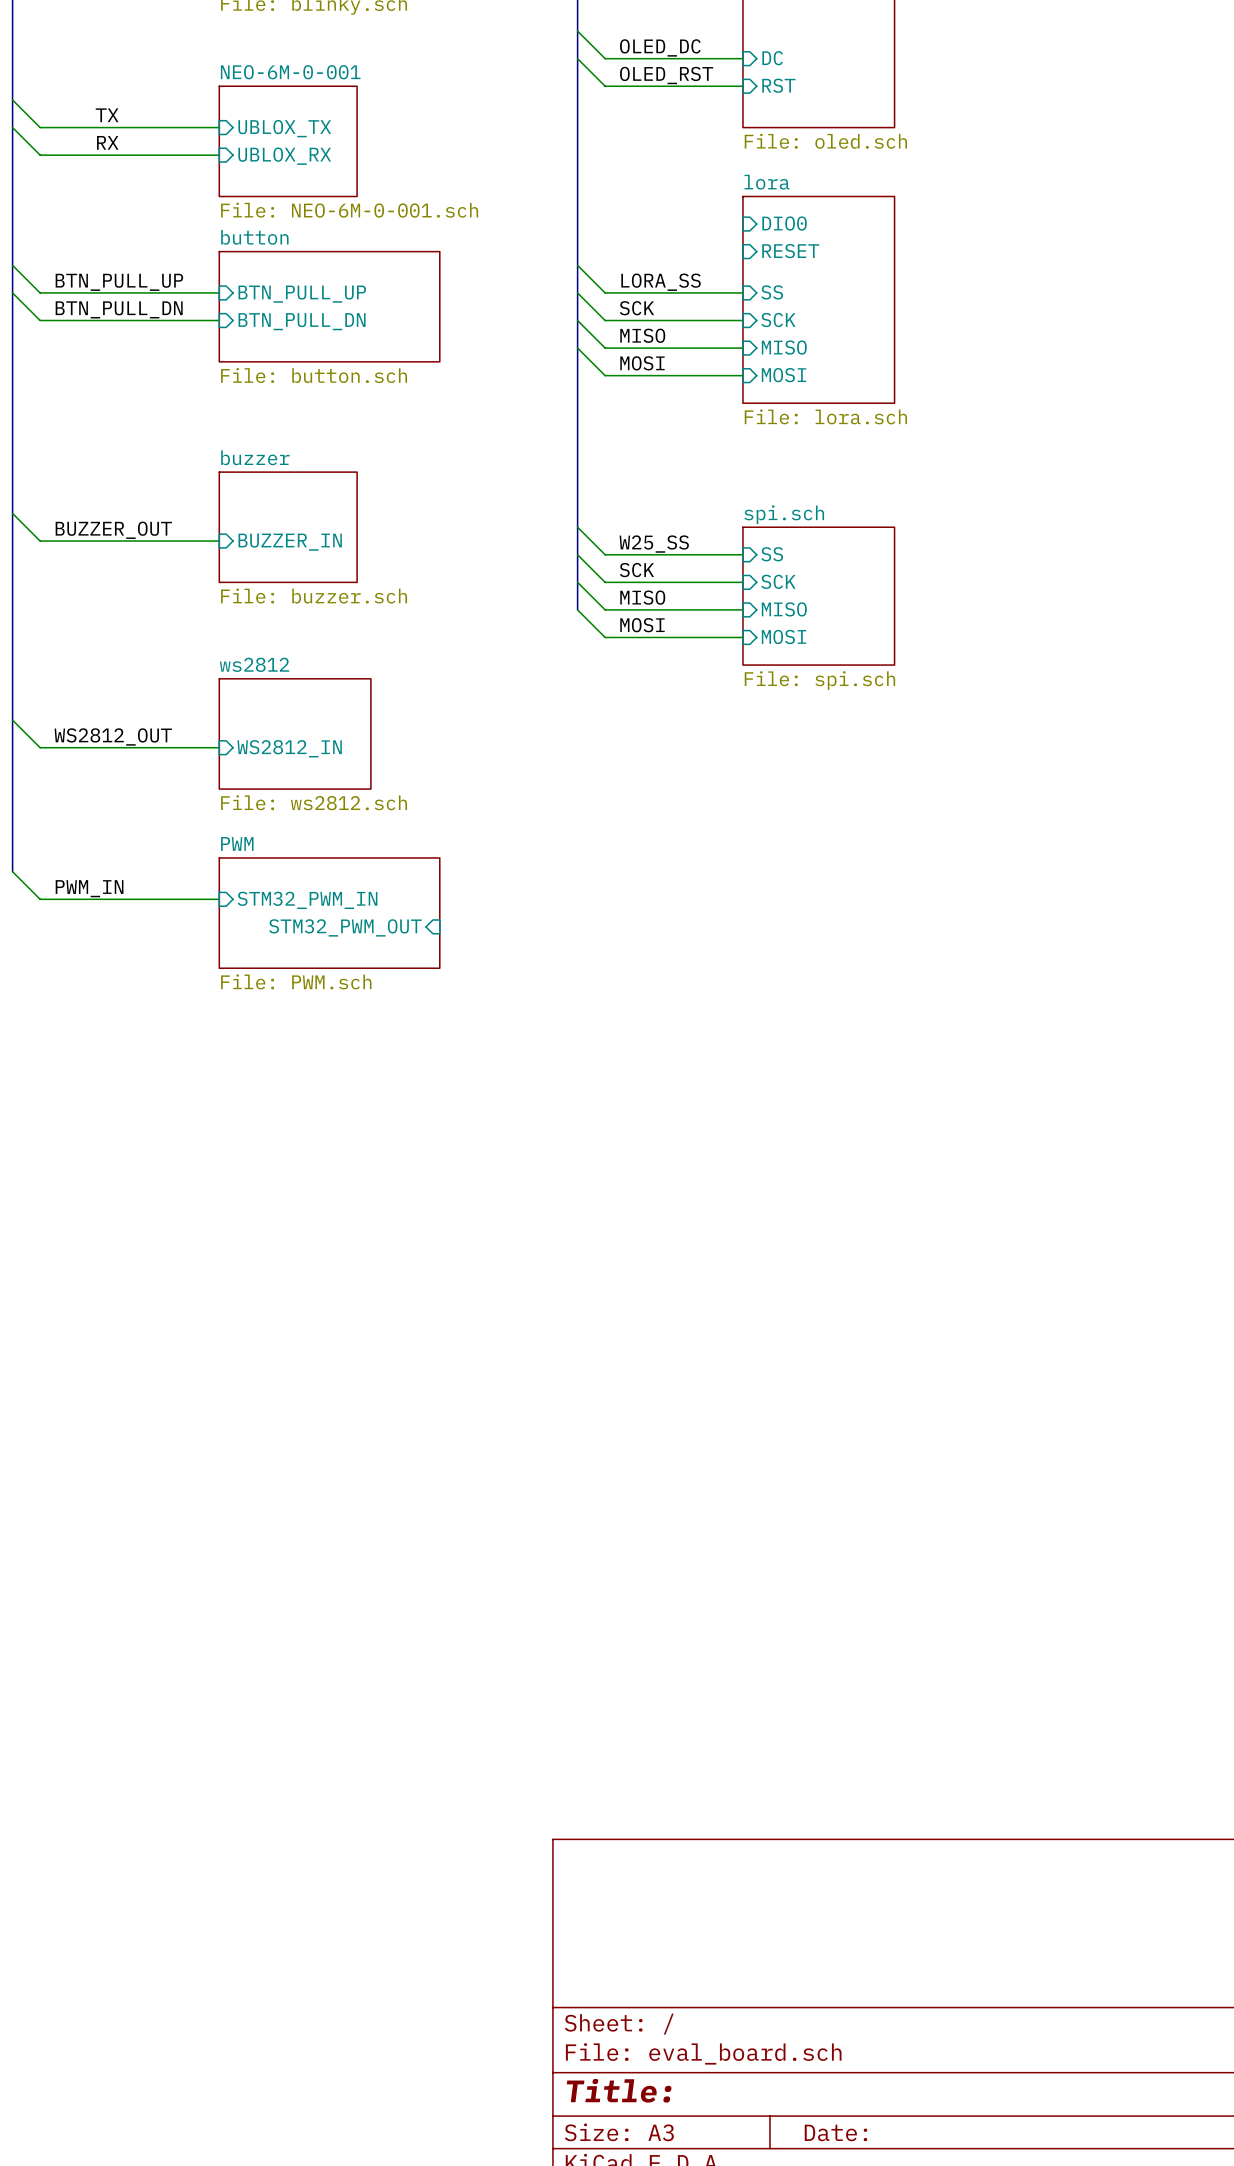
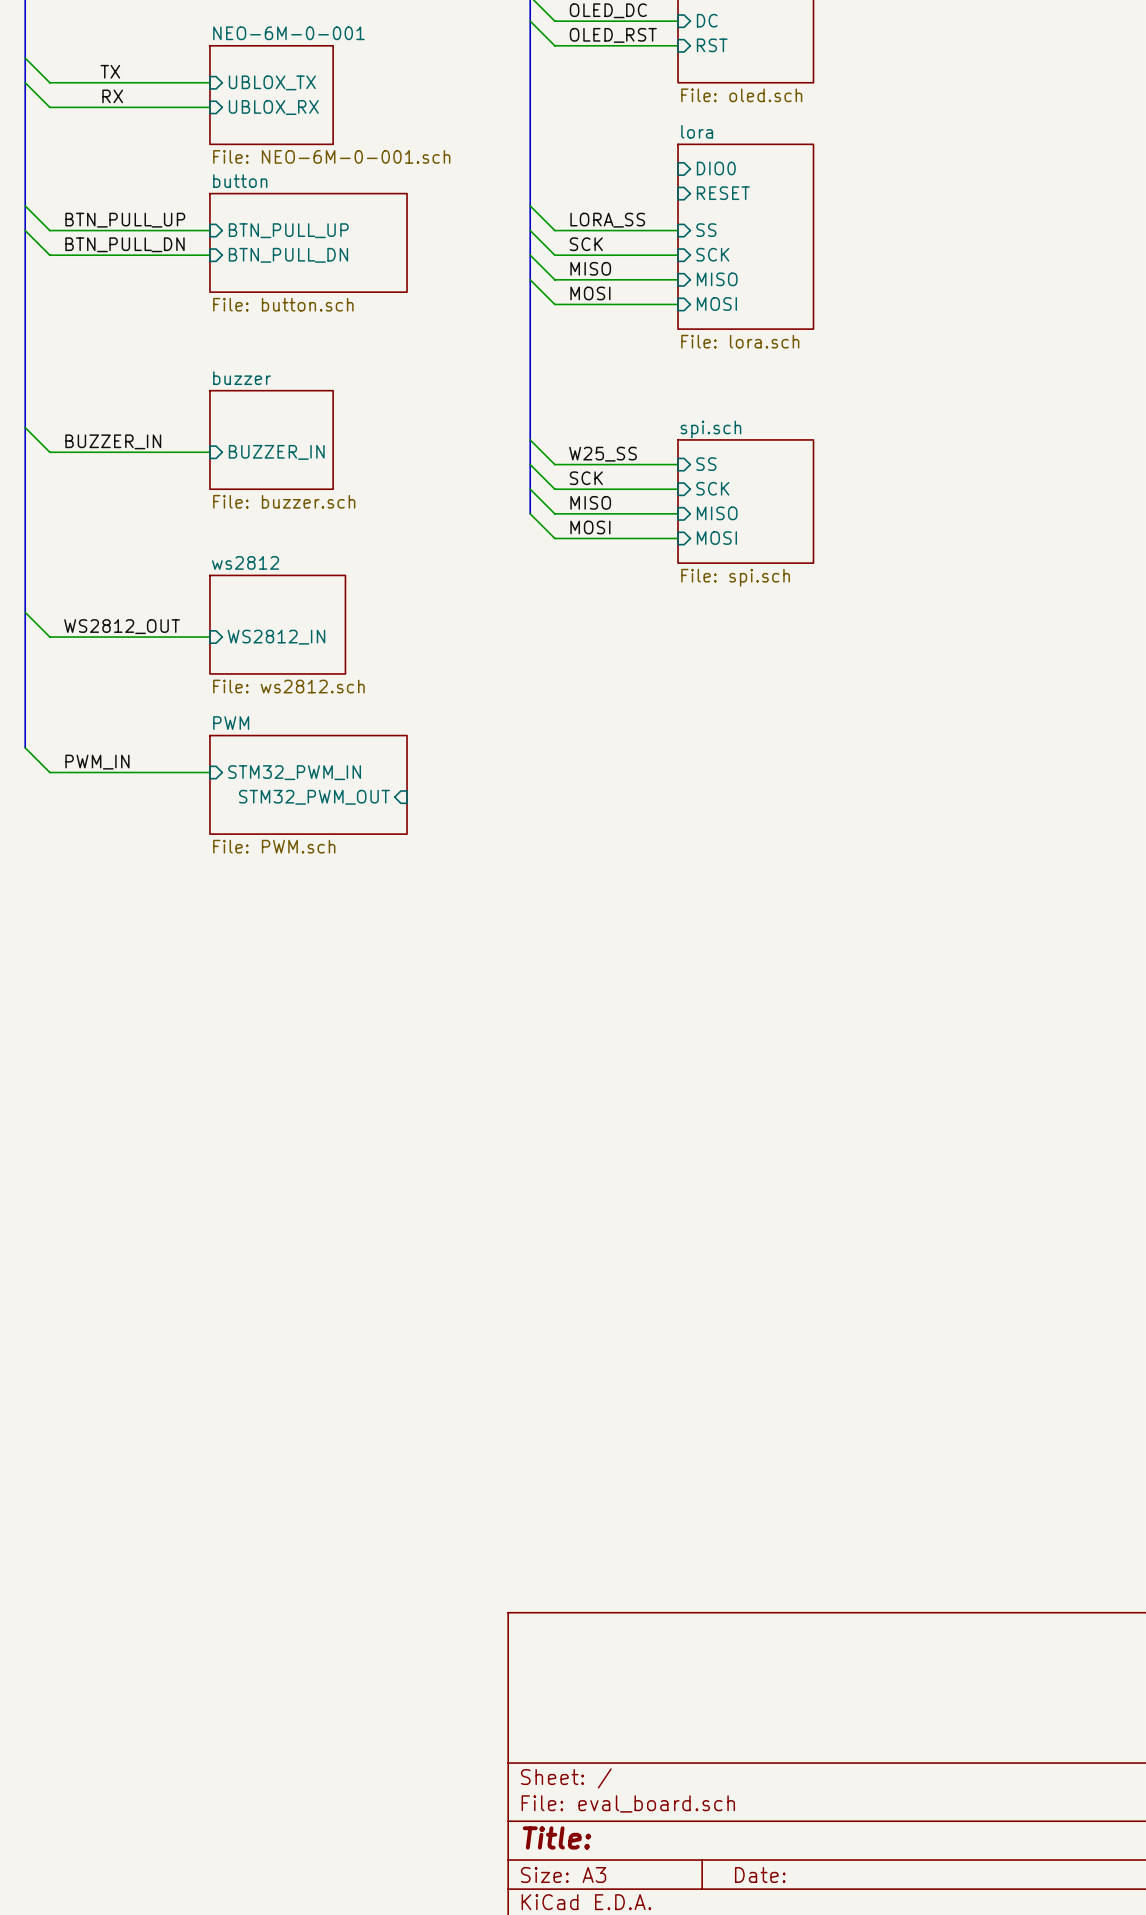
label: BUZZER_OUT (113, 530) -> BUZZER_IN (113, 441)

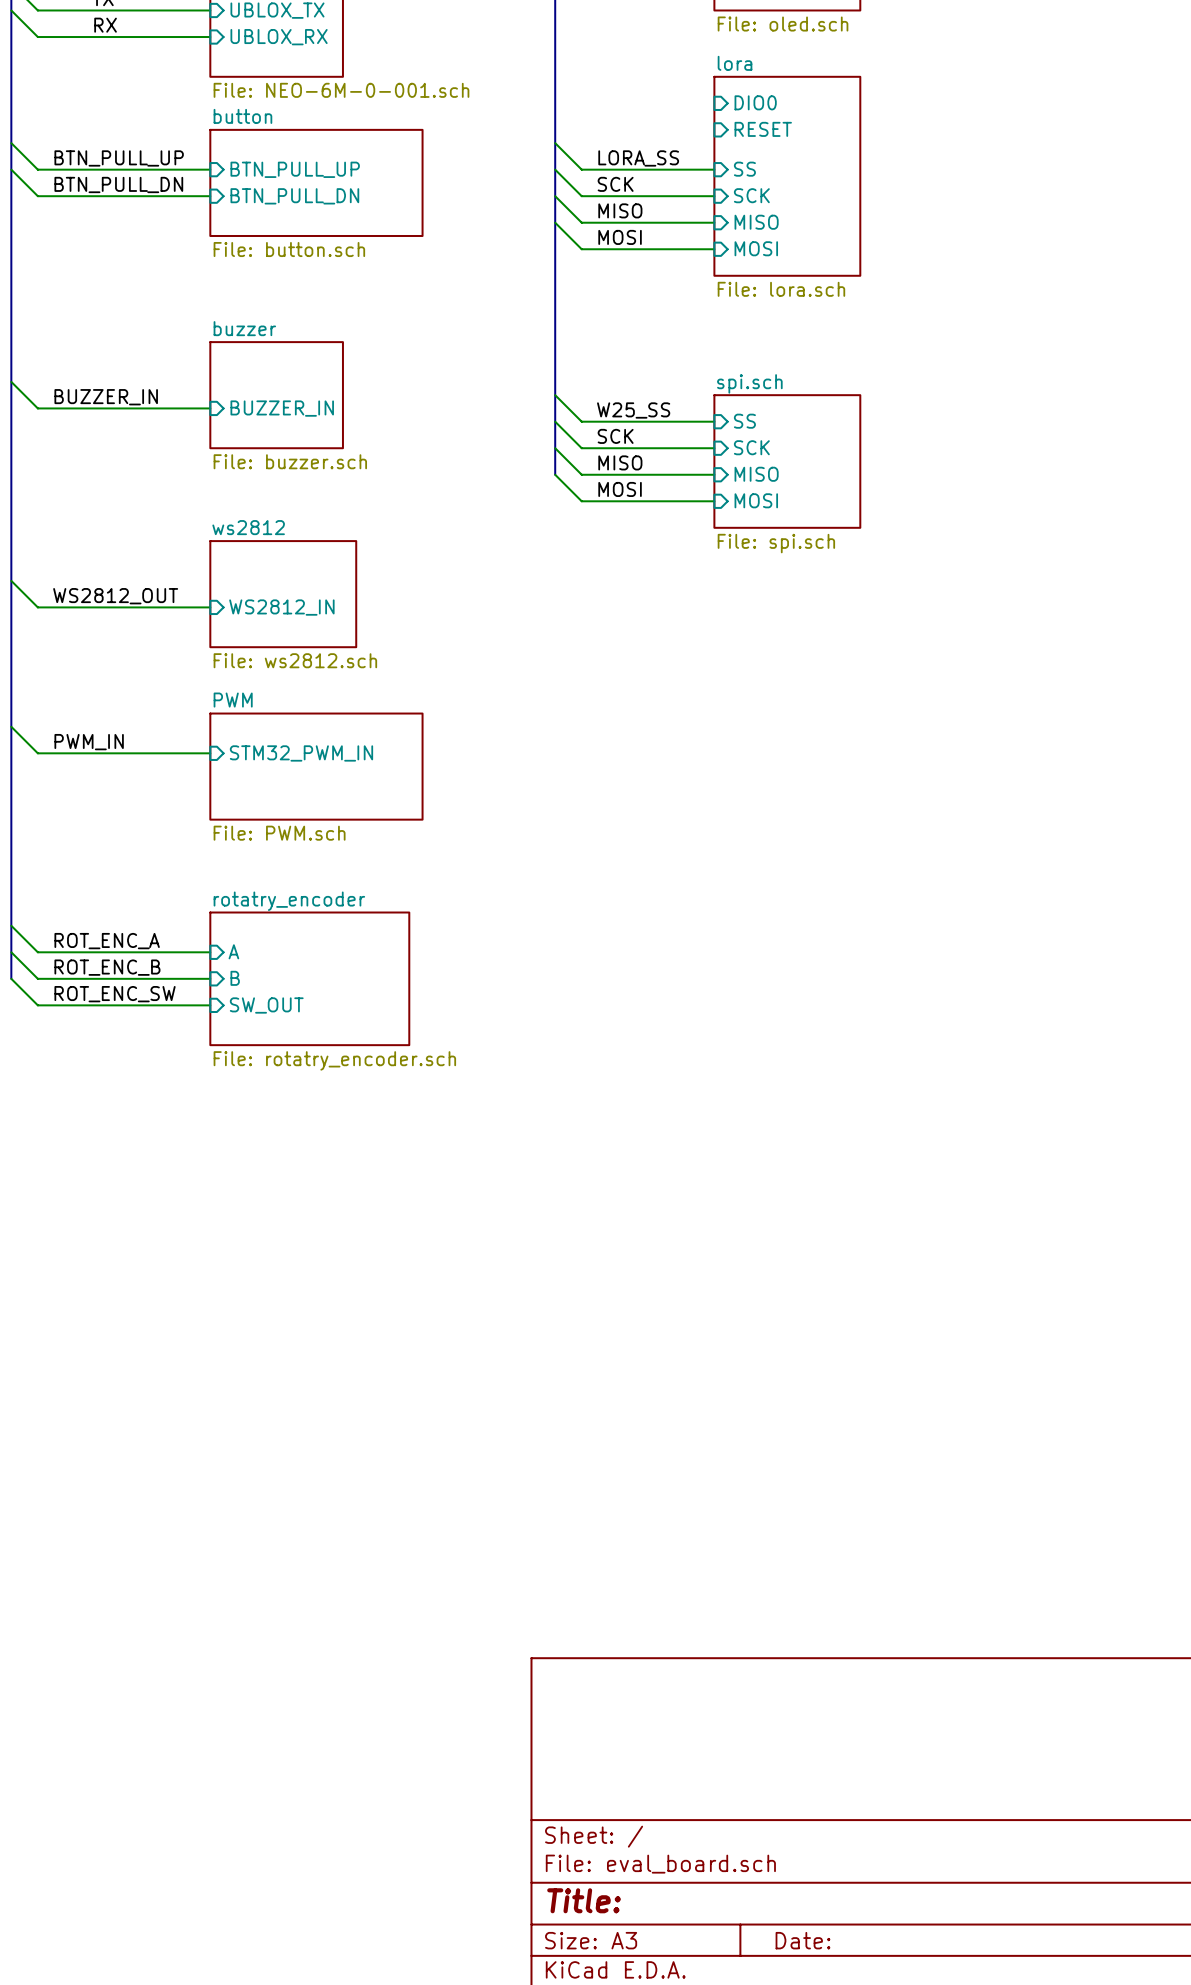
bus: none -> (11, 726) (11, 978)
sheet pin: STM32_PWM_OUT (314, 797) -> none
wire: none -> (11, 925) (37, 952) (210, 952)
label: none -> ROT_ENC_A (107, 941)
sheet pin: none -> A (233, 951)
wire: none -> (11, 952) (37, 978) (210, 978)
label: none -> ROT_ENC_B (107, 967)
wire: none -> (11, 978) (37, 1005) (210, 1005)
sheet pin: none -> B (235, 978)
sheet rotatry_encoder: none -> File: rotatry_encoder.sch (309, 978)
label: none -> ROT_ENC_SW (115, 994)
sheet pin: none -> SW_OUT (266, 1005)

